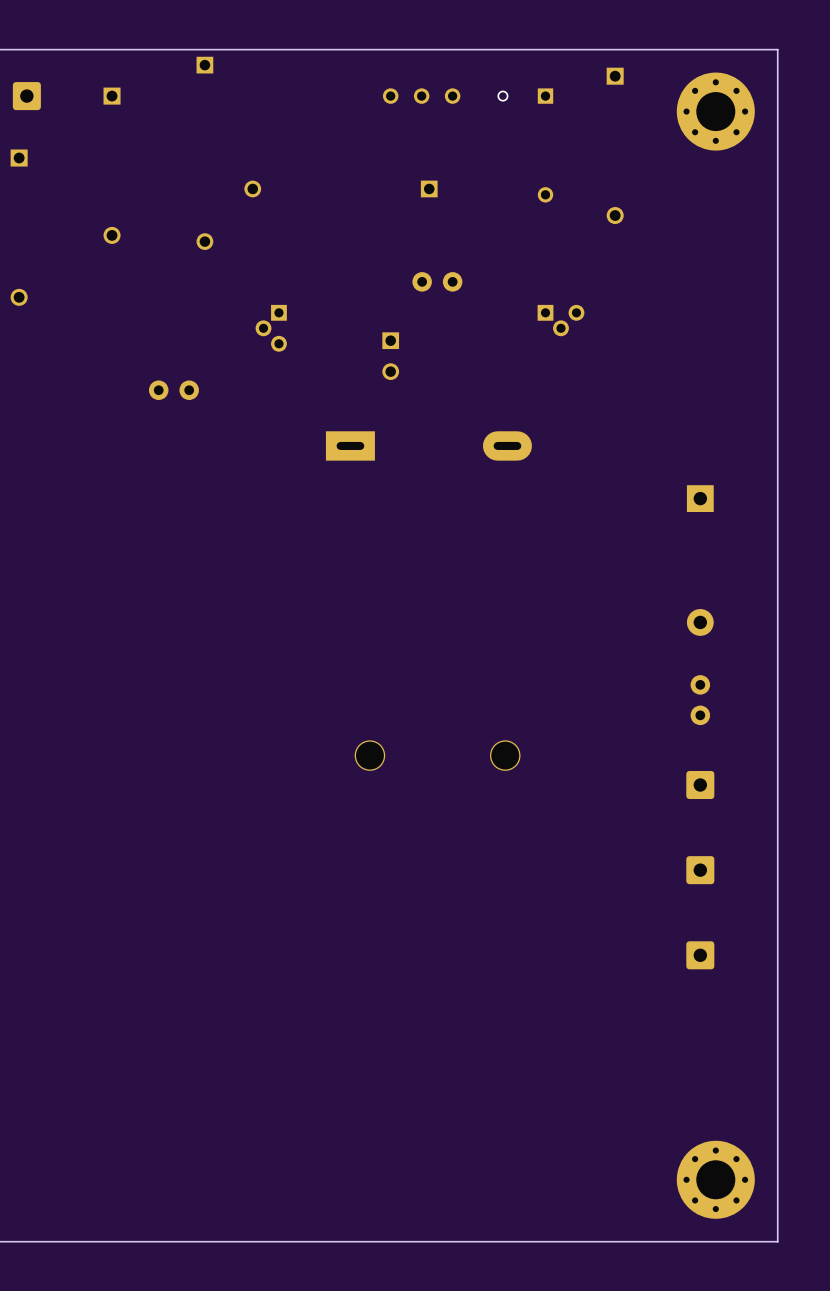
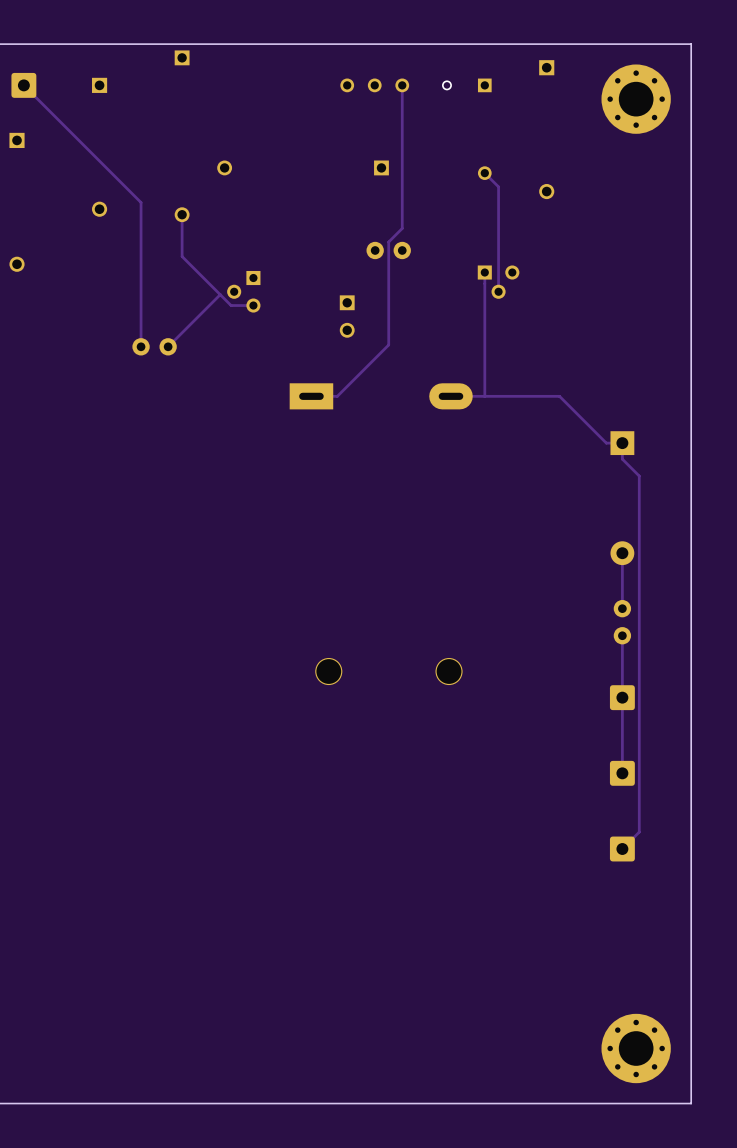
track: none -> (23, 85) (141, 202) (141, 346)
track: none -> (402, 85) (402, 228) (388, 242) (388, 344) (337, 396) (311, 396)
track: none -> (484, 173) (498, 186) (498, 291)
track: none -> (182, 214) (182, 256) (231, 305) (253, 305)
part footprint: [255, 304, 287, 352] -> [227, 270, 261, 313]
part footprint: [537, 304, 585, 337] -> [477, 265, 520, 299]
track: none -> (484, 272) (484, 396)
track: none -> (220, 294) (168, 346)
track: none -> (450, 396) (559, 396) (606, 443) (622, 443) (622, 459) (639, 476) (639, 832) (622, 849)
track: none -> (622, 553) (622, 608)
track: none -> (622, 635) (622, 773)

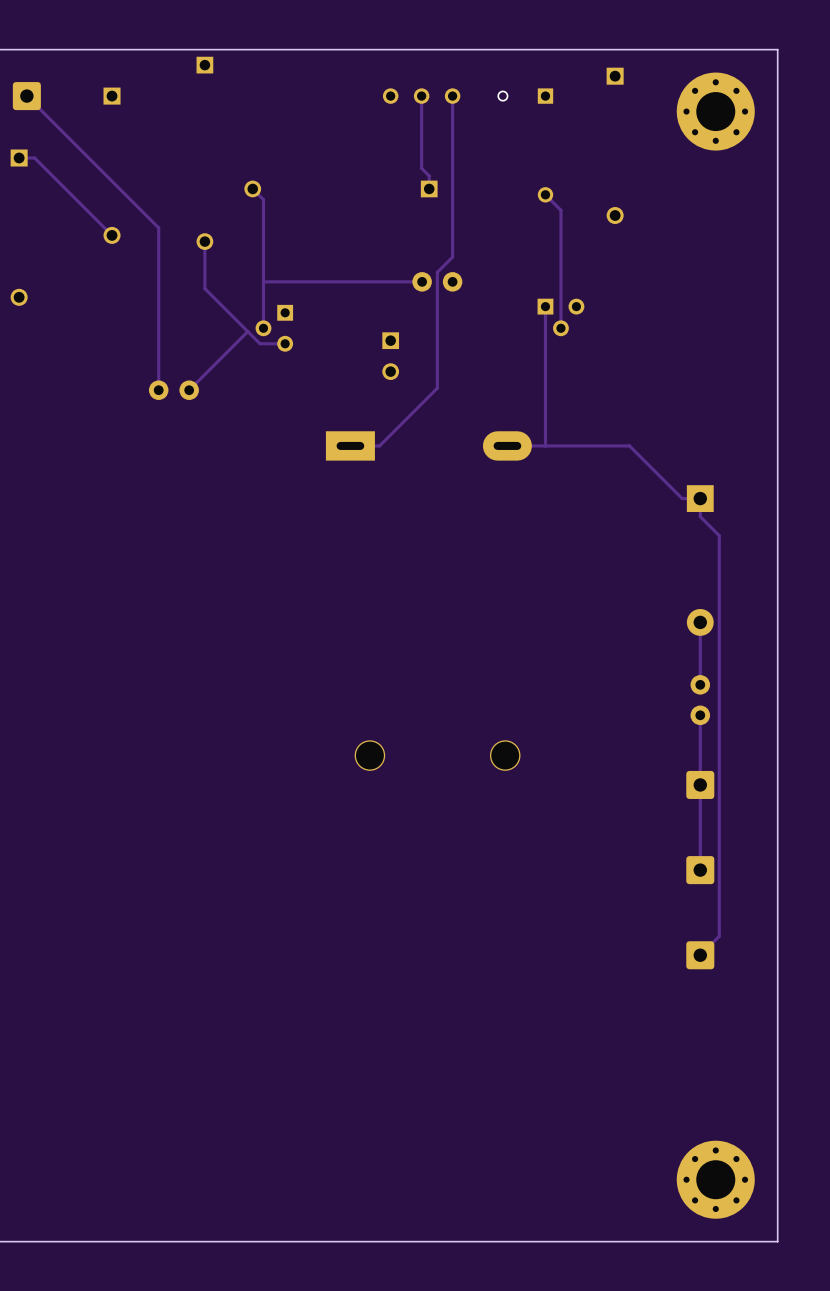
track: none -> (421, 96) (421, 168) (429, 175) (429, 188)
track: none -> (19, 158) (34, 158) (112, 235)
track: none -> (252, 188) (263, 199) (263, 328)
track: none -> (422, 281) (263, 281)

